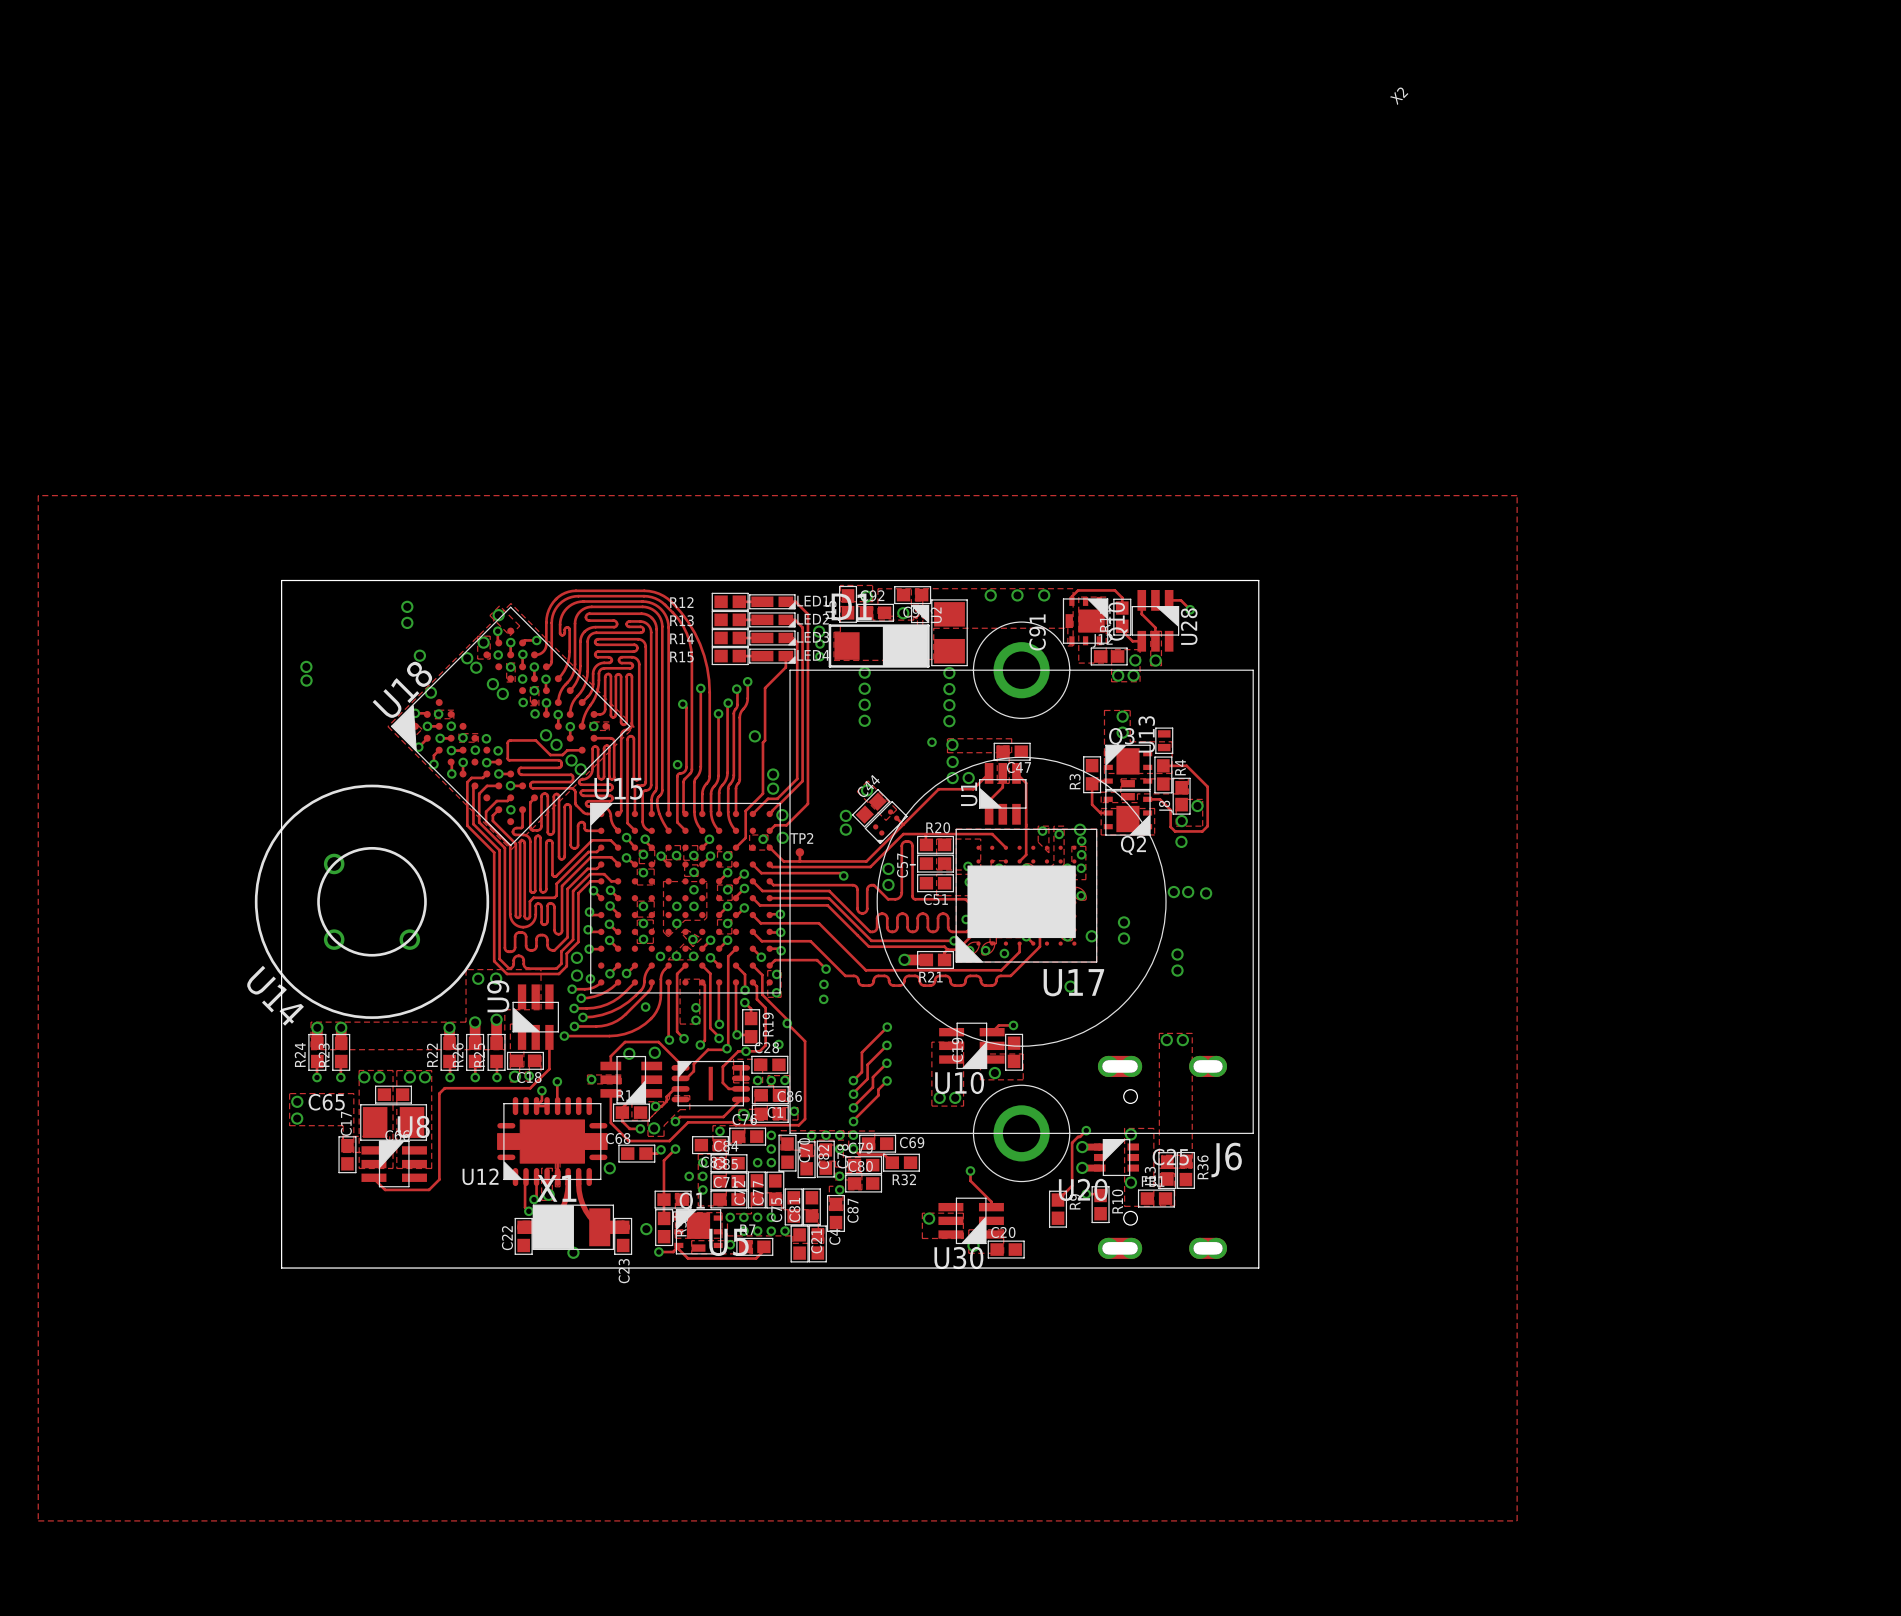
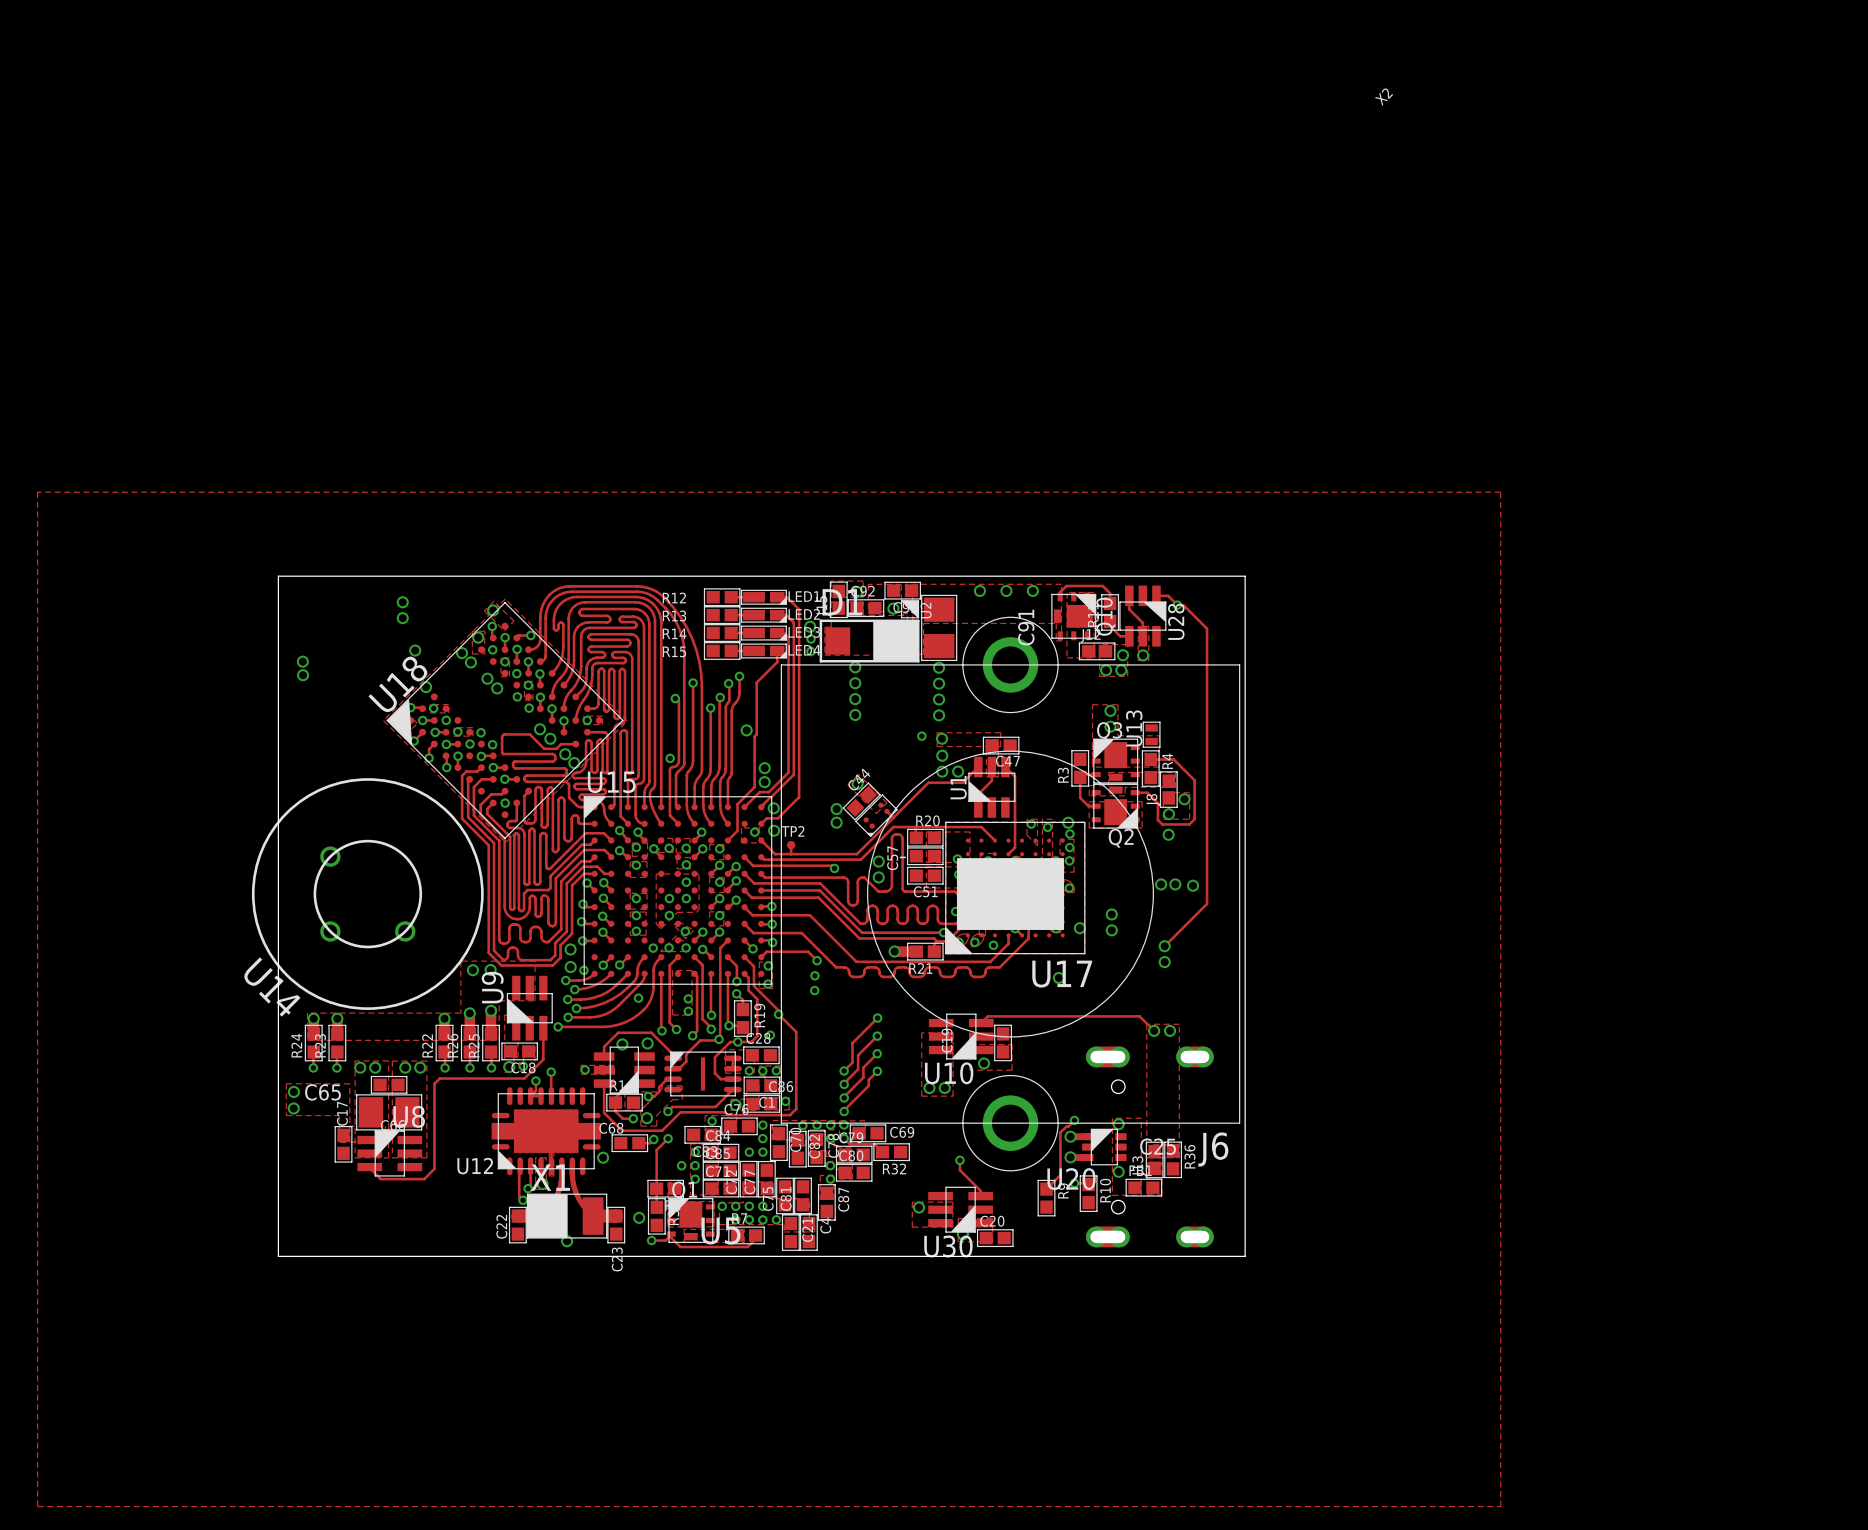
track: none -> (1177, 605) (1183, 605) (1207, 628) (1207, 903) (1164, 946)
track: none -> (1002, 1016) (1139, 1016) (1154, 1030)
via: (1013, 1025) -> none
via: (730, 1244) -> none

